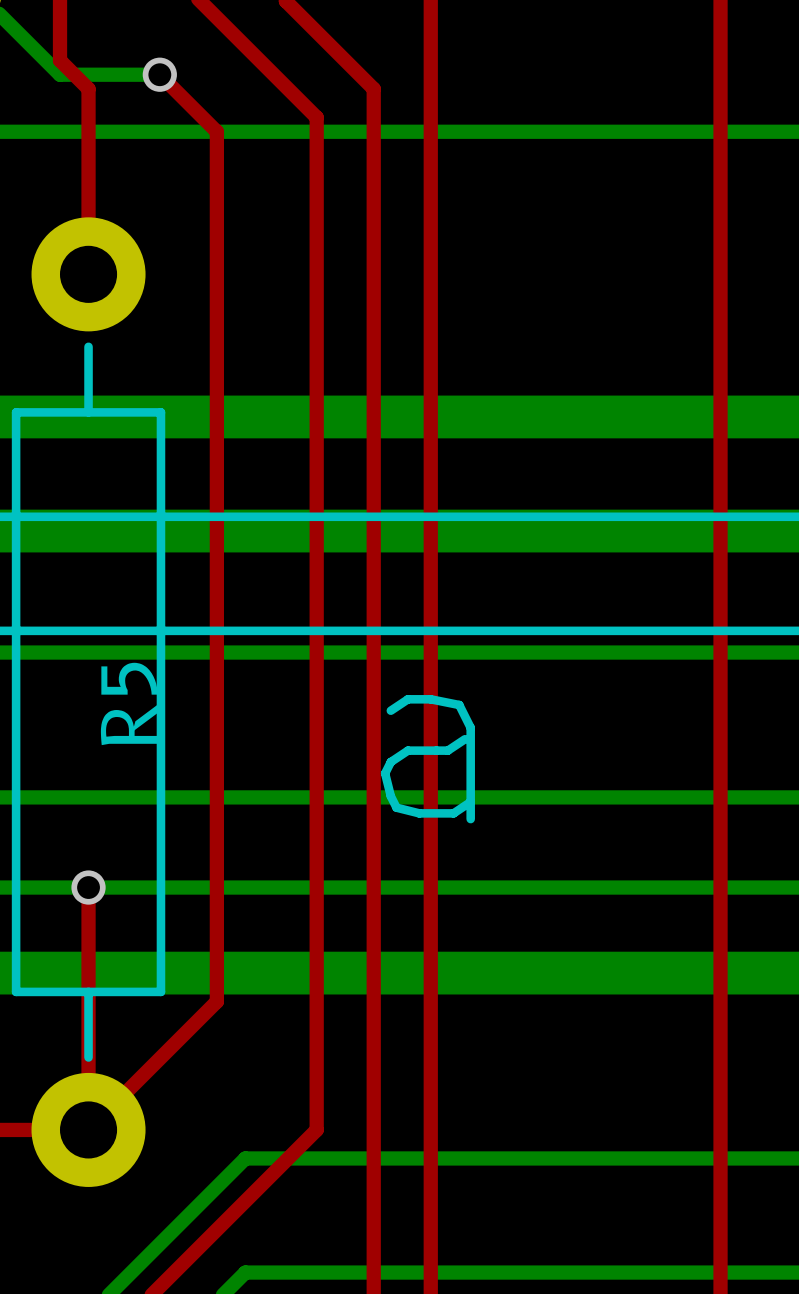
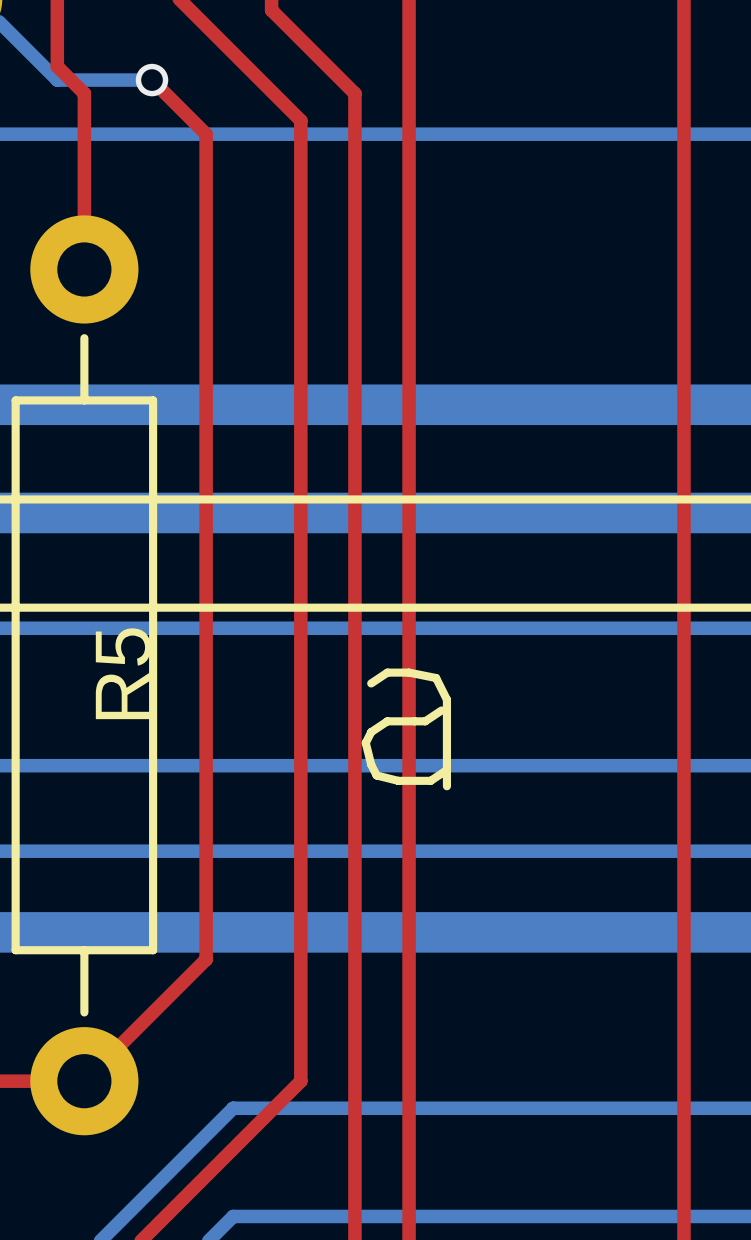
top track: (88, 887) (88, 1129) -> none
via: (88, 887) -> none

